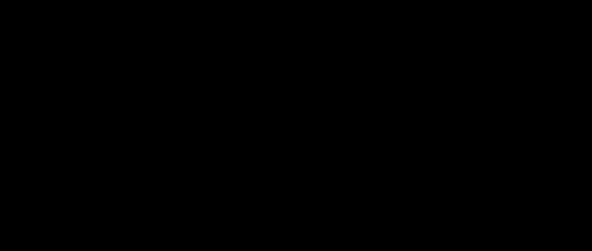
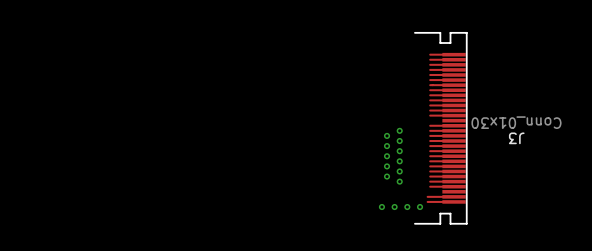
top track: none -> (430, 54) (454, 54)
top track: none -> (430, 59) (454, 59)
top track: none -> (430, 64) (454, 64)
top track: none -> (430, 69) (454, 69)
top track: none -> (430, 74) (454, 74)
top track: none -> (430, 80) (454, 80)
top track: none -> (430, 85) (454, 85)
top track: none -> (430, 90) (454, 90)
top track: none -> (430, 95) (454, 95)
top track: none -> (430, 100) (454, 100)
top track: none -> (430, 105) (454, 105)
top track: none -> (430, 110) (454, 110)
top track: none -> (430, 115) (454, 115)
top track: none -> (430, 125) (454, 125)
J3: none -> Conn_01x30 (440, 128)
via: none -> (399, 130)
top track: none -> (430, 130) (454, 130)
via: none -> (387, 135)
top track: none -> (430, 135) (454, 135)
via: none -> (399, 141)
top track: none -> (430, 141) (454, 141)
via: none -> (387, 146)
top track: none -> (430, 146) (454, 146)
via: none -> (399, 151)
top track: none -> (430, 151) (454, 151)
via: none -> (387, 156)
top track: none -> (430, 156) (454, 156)
via: none -> (399, 161)
top track: none -> (430, 161) (454, 161)
via: none -> (387, 166)
top track: none -> (430, 166) (454, 166)
via: none -> (399, 171)
top track: none -> (430, 171) (454, 171)
via: none -> (387, 176)
top track: none -> (430, 176) (454, 176)
via: none -> (399, 181)
top track: none -> (430, 181) (454, 181)
top track: none -> (430, 186) (454, 186)
top track: none -> (427, 196) (454, 196)
top track: none -> (427, 201) (454, 201)
via: none -> (381, 207)
via: none -> (394, 207)
via: none -> (407, 207)
via: none -> (420, 207)

